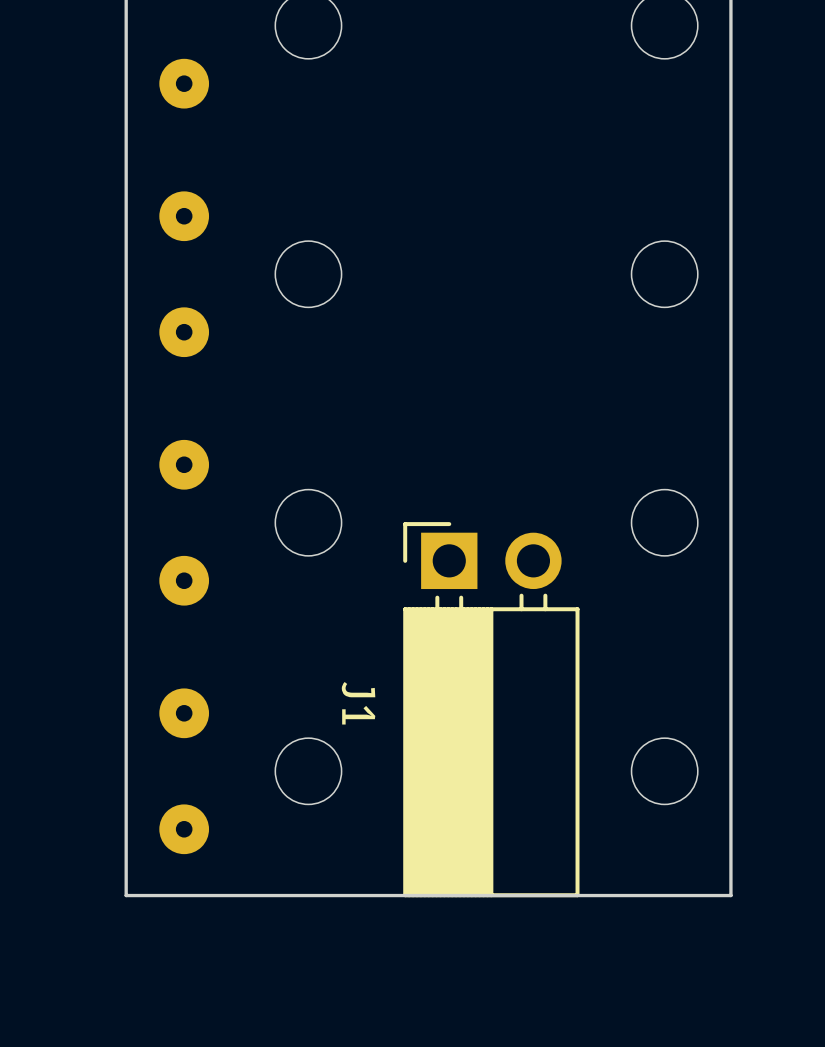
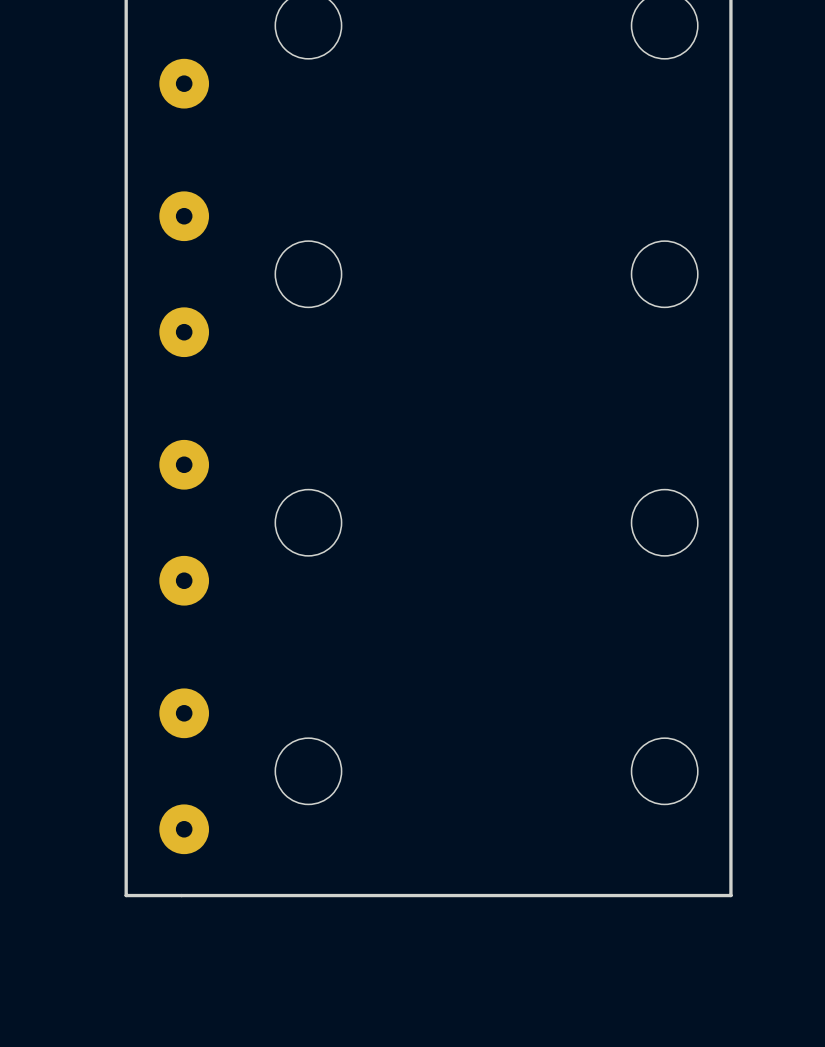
J1: (491, 709) -> none

